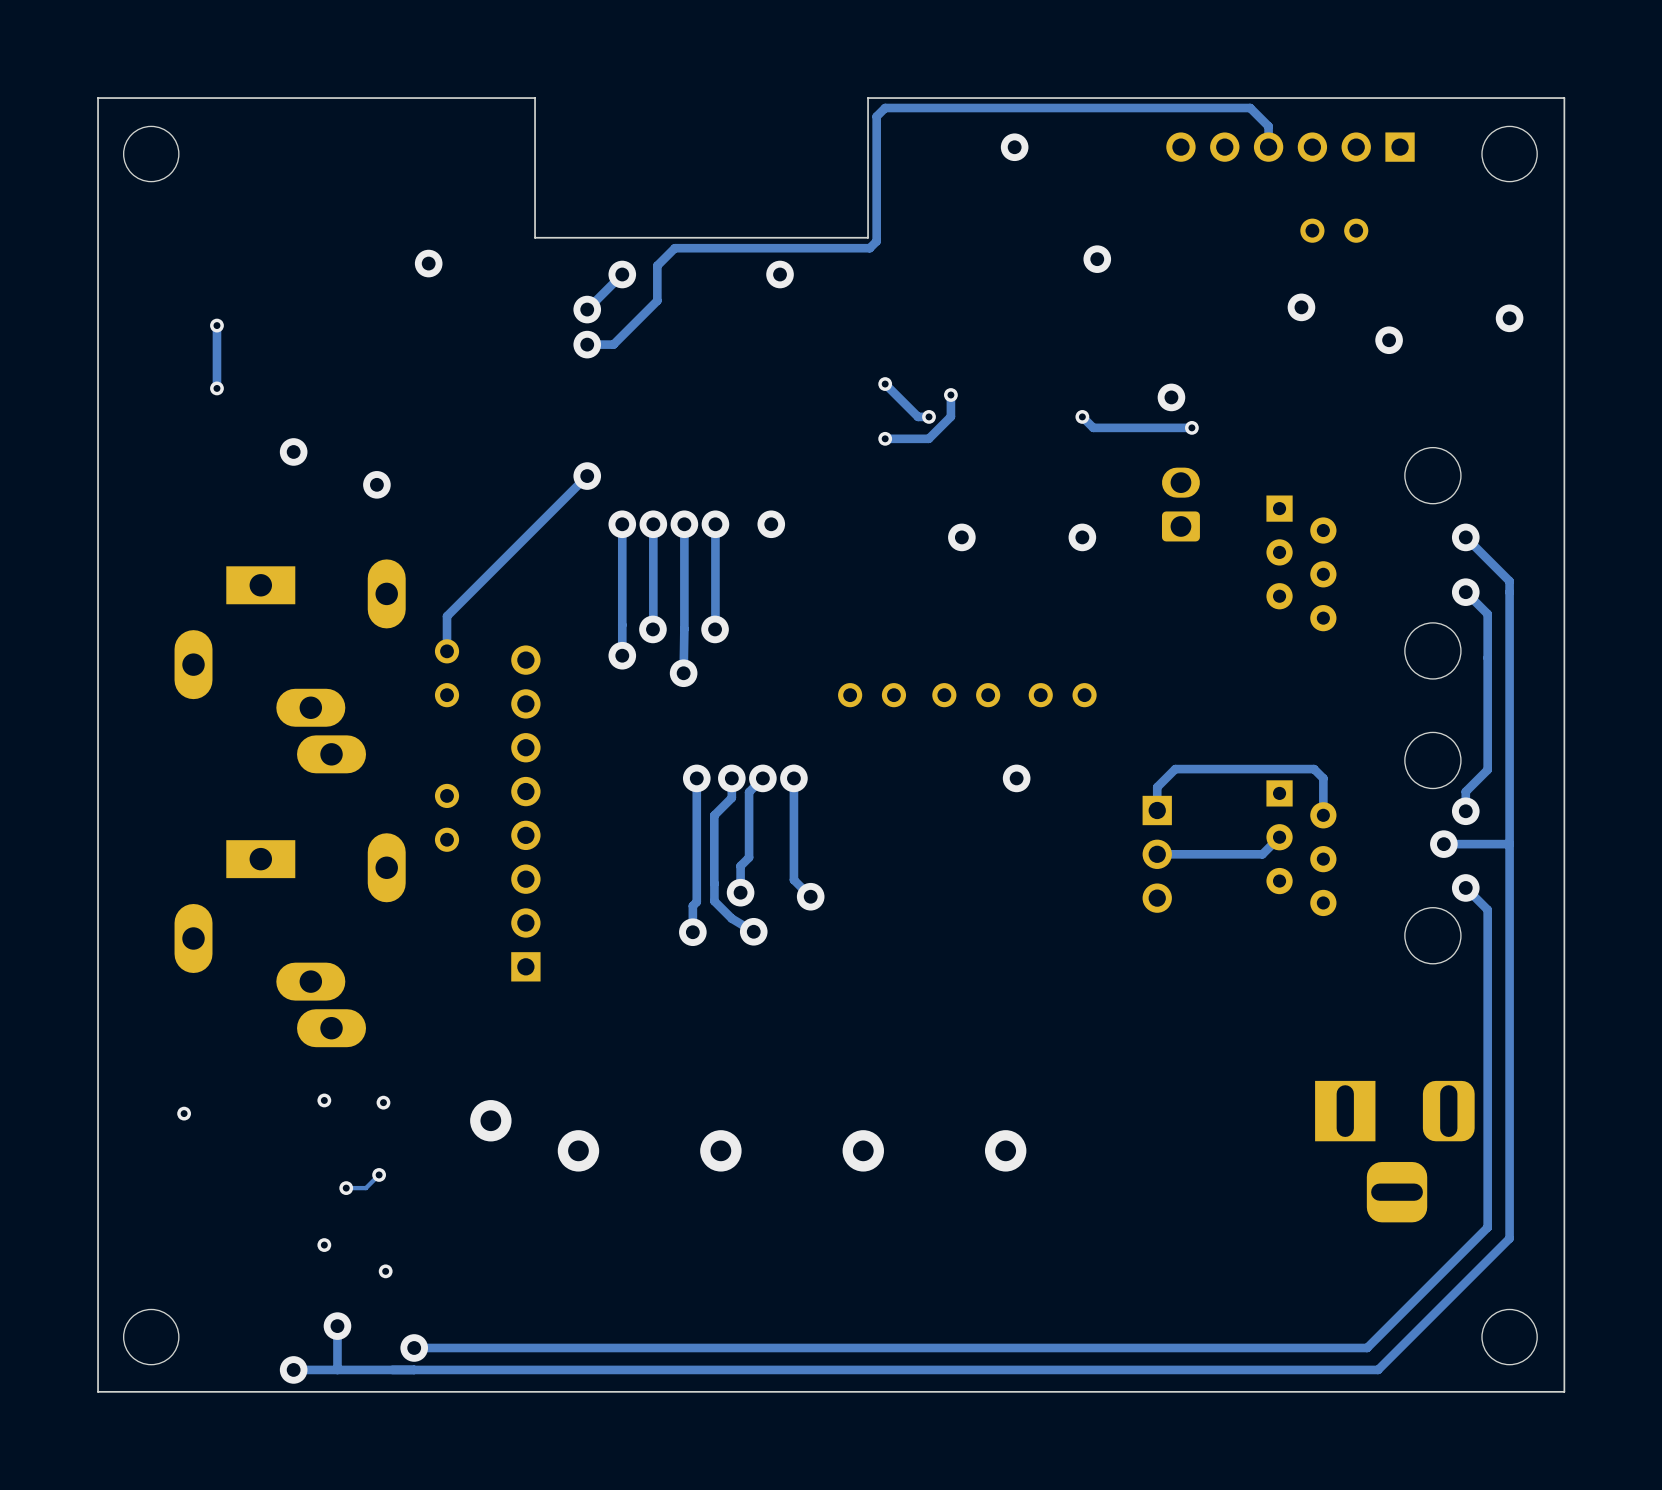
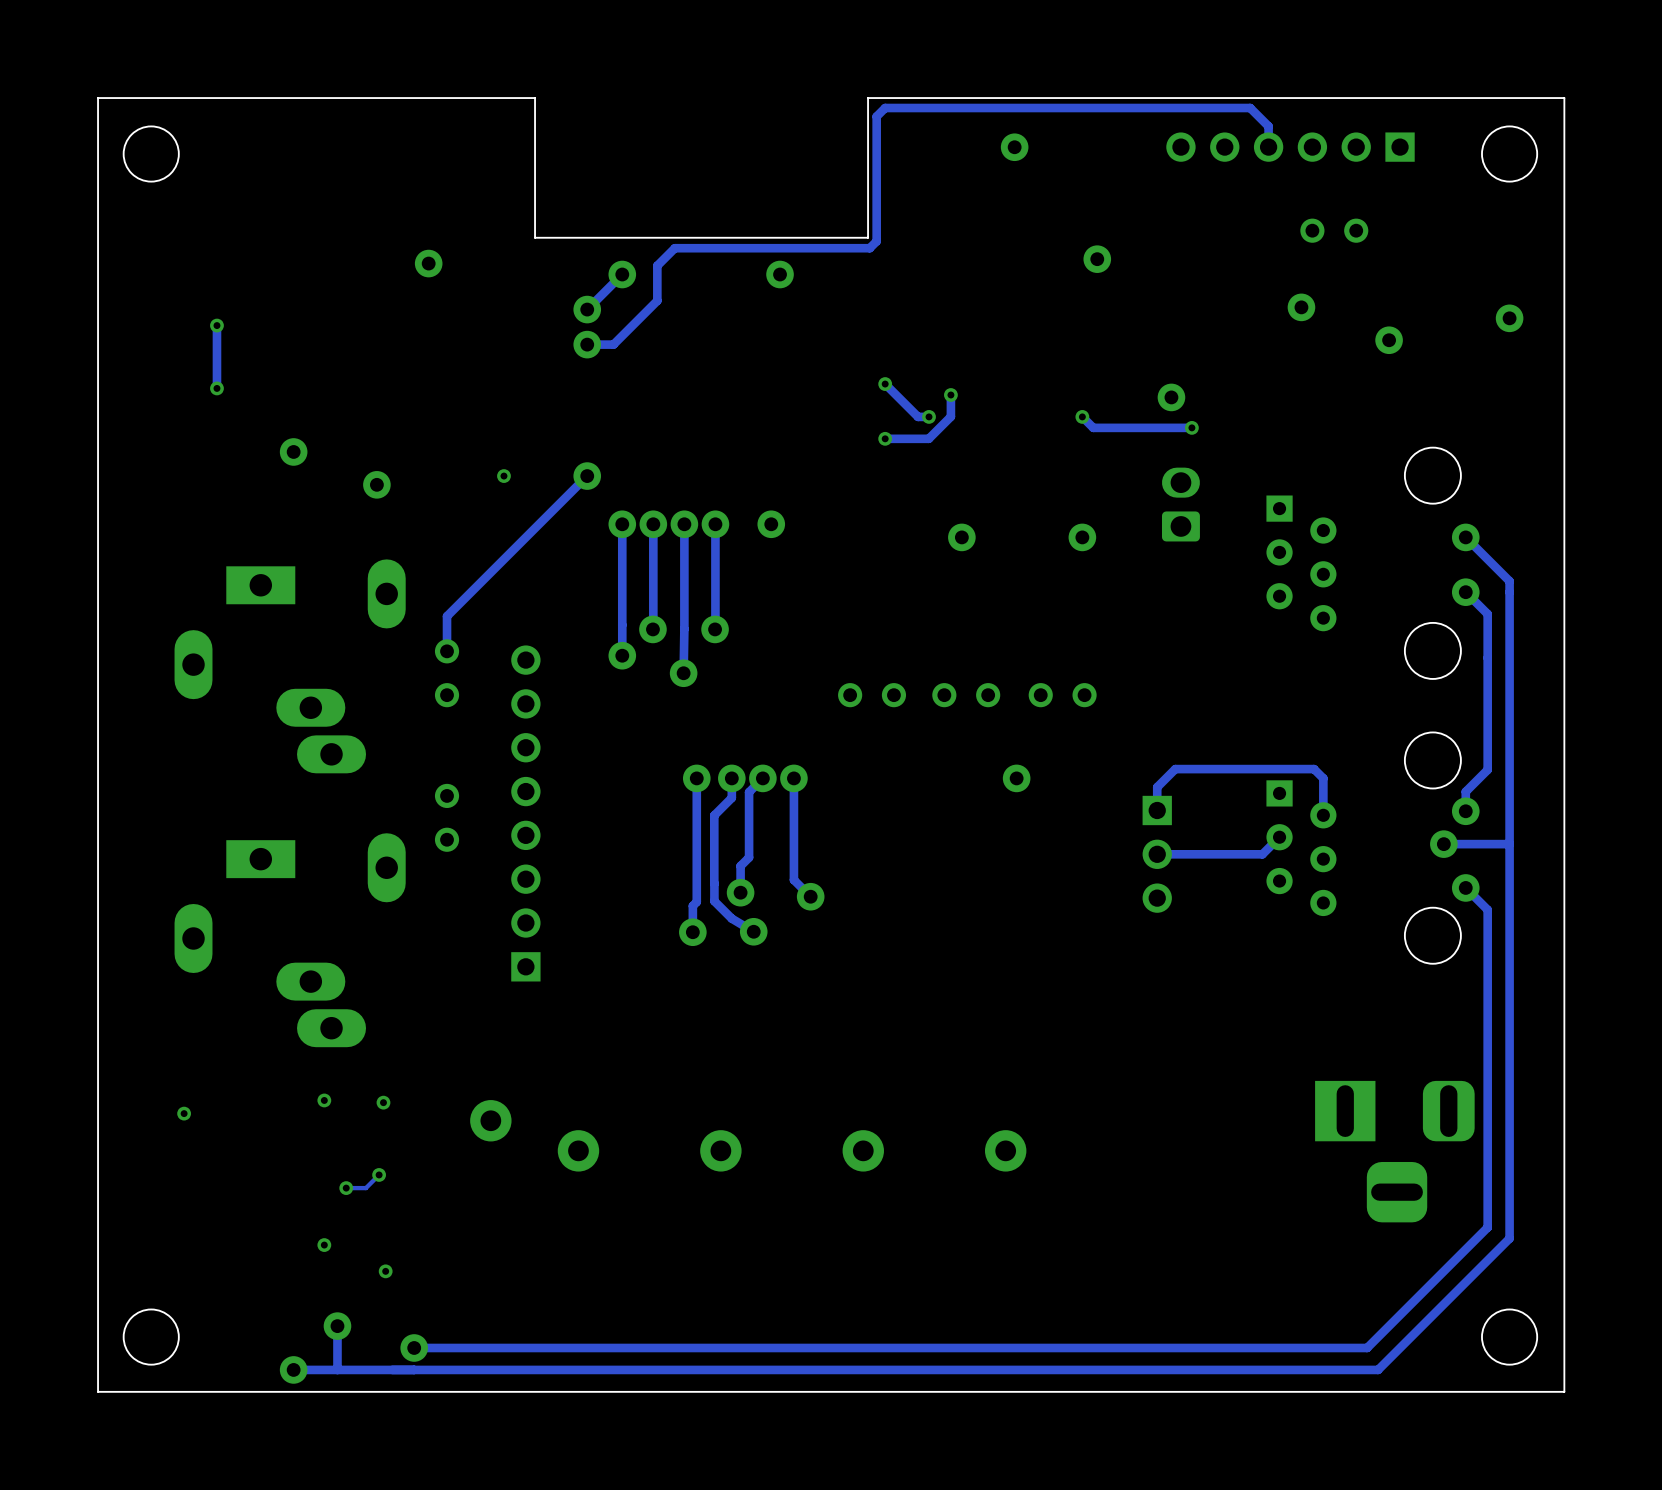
via: none -> (503, 476)

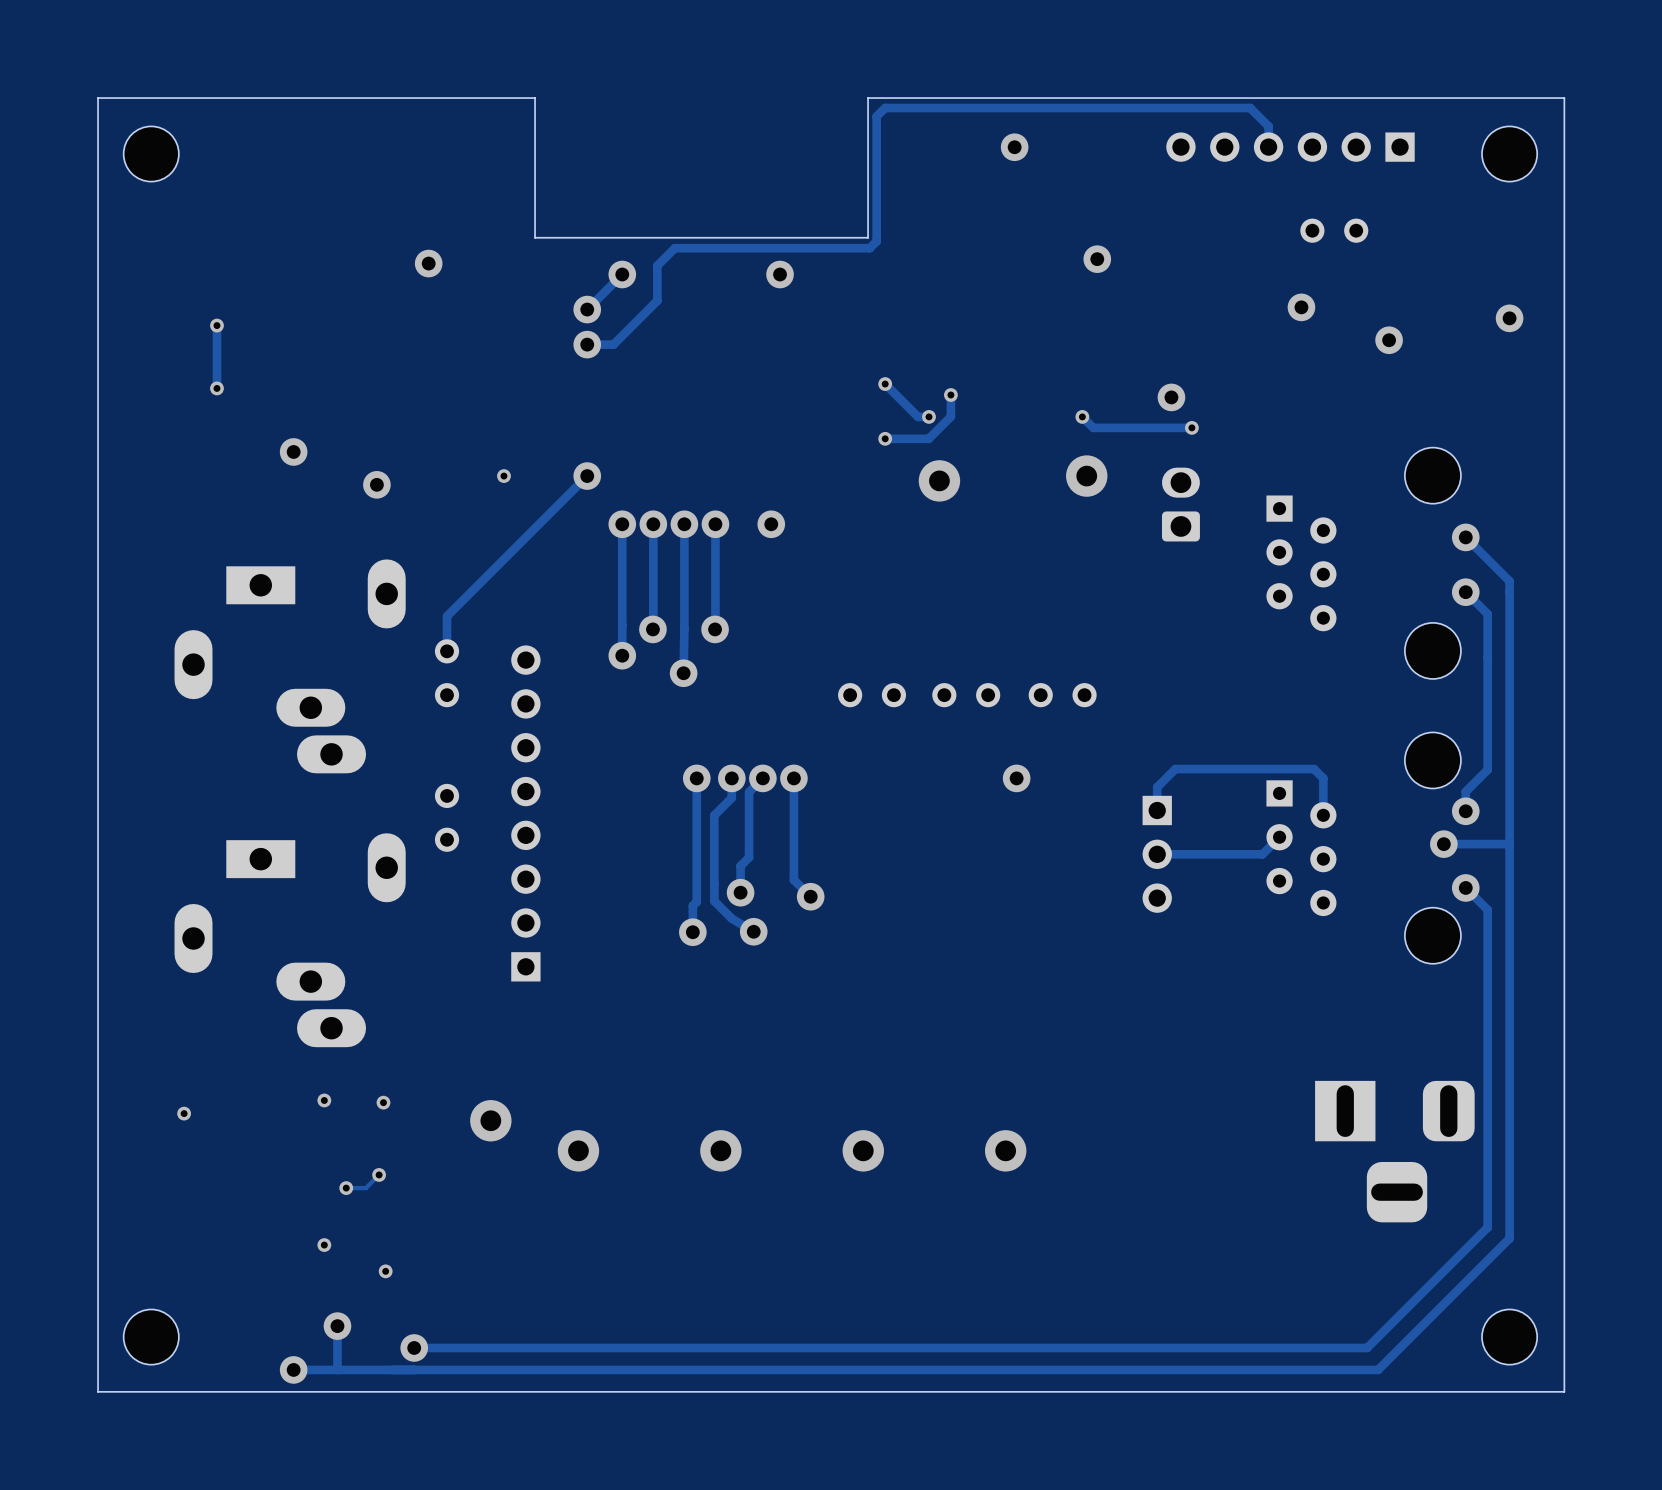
via: none -> (1086, 476)
via: none -> (939, 480)
via: (961, 537) -> none
via: (1082, 537) -> none

